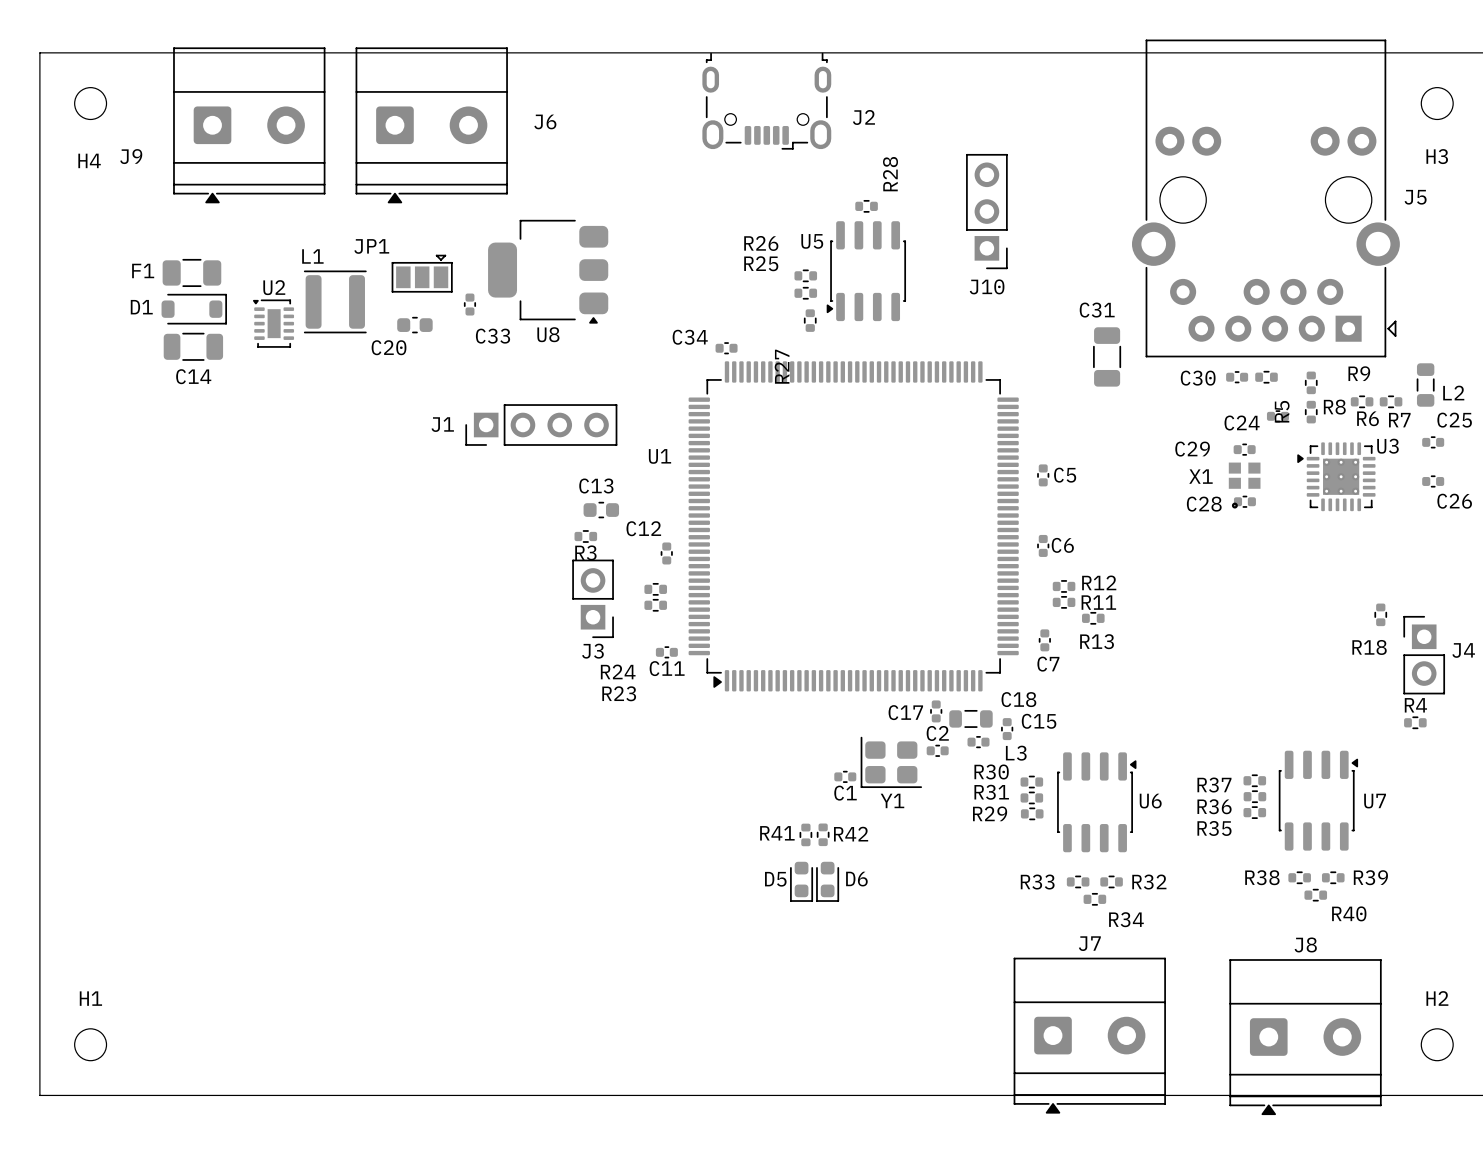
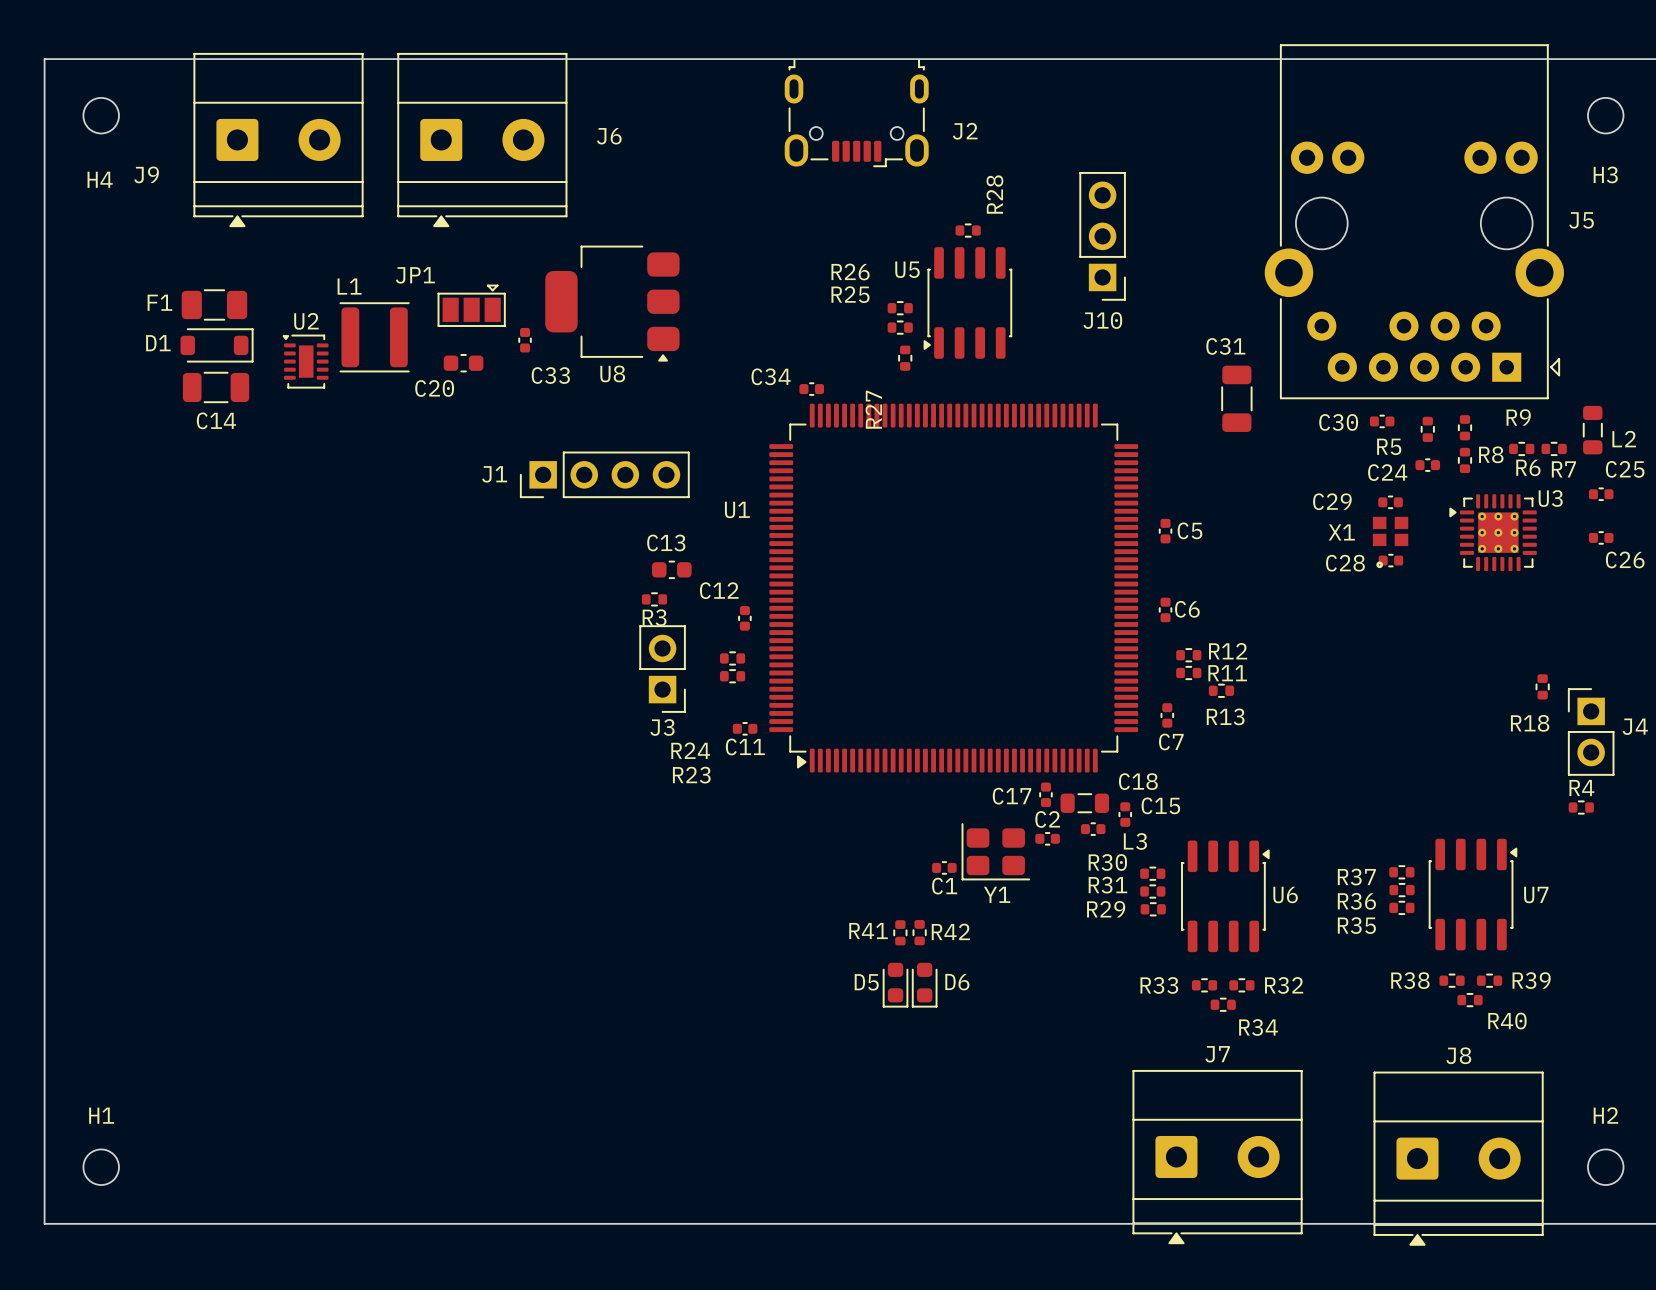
R5 rotation: 0° (1266, 377) -> 90° clockwise (1427, 429)

